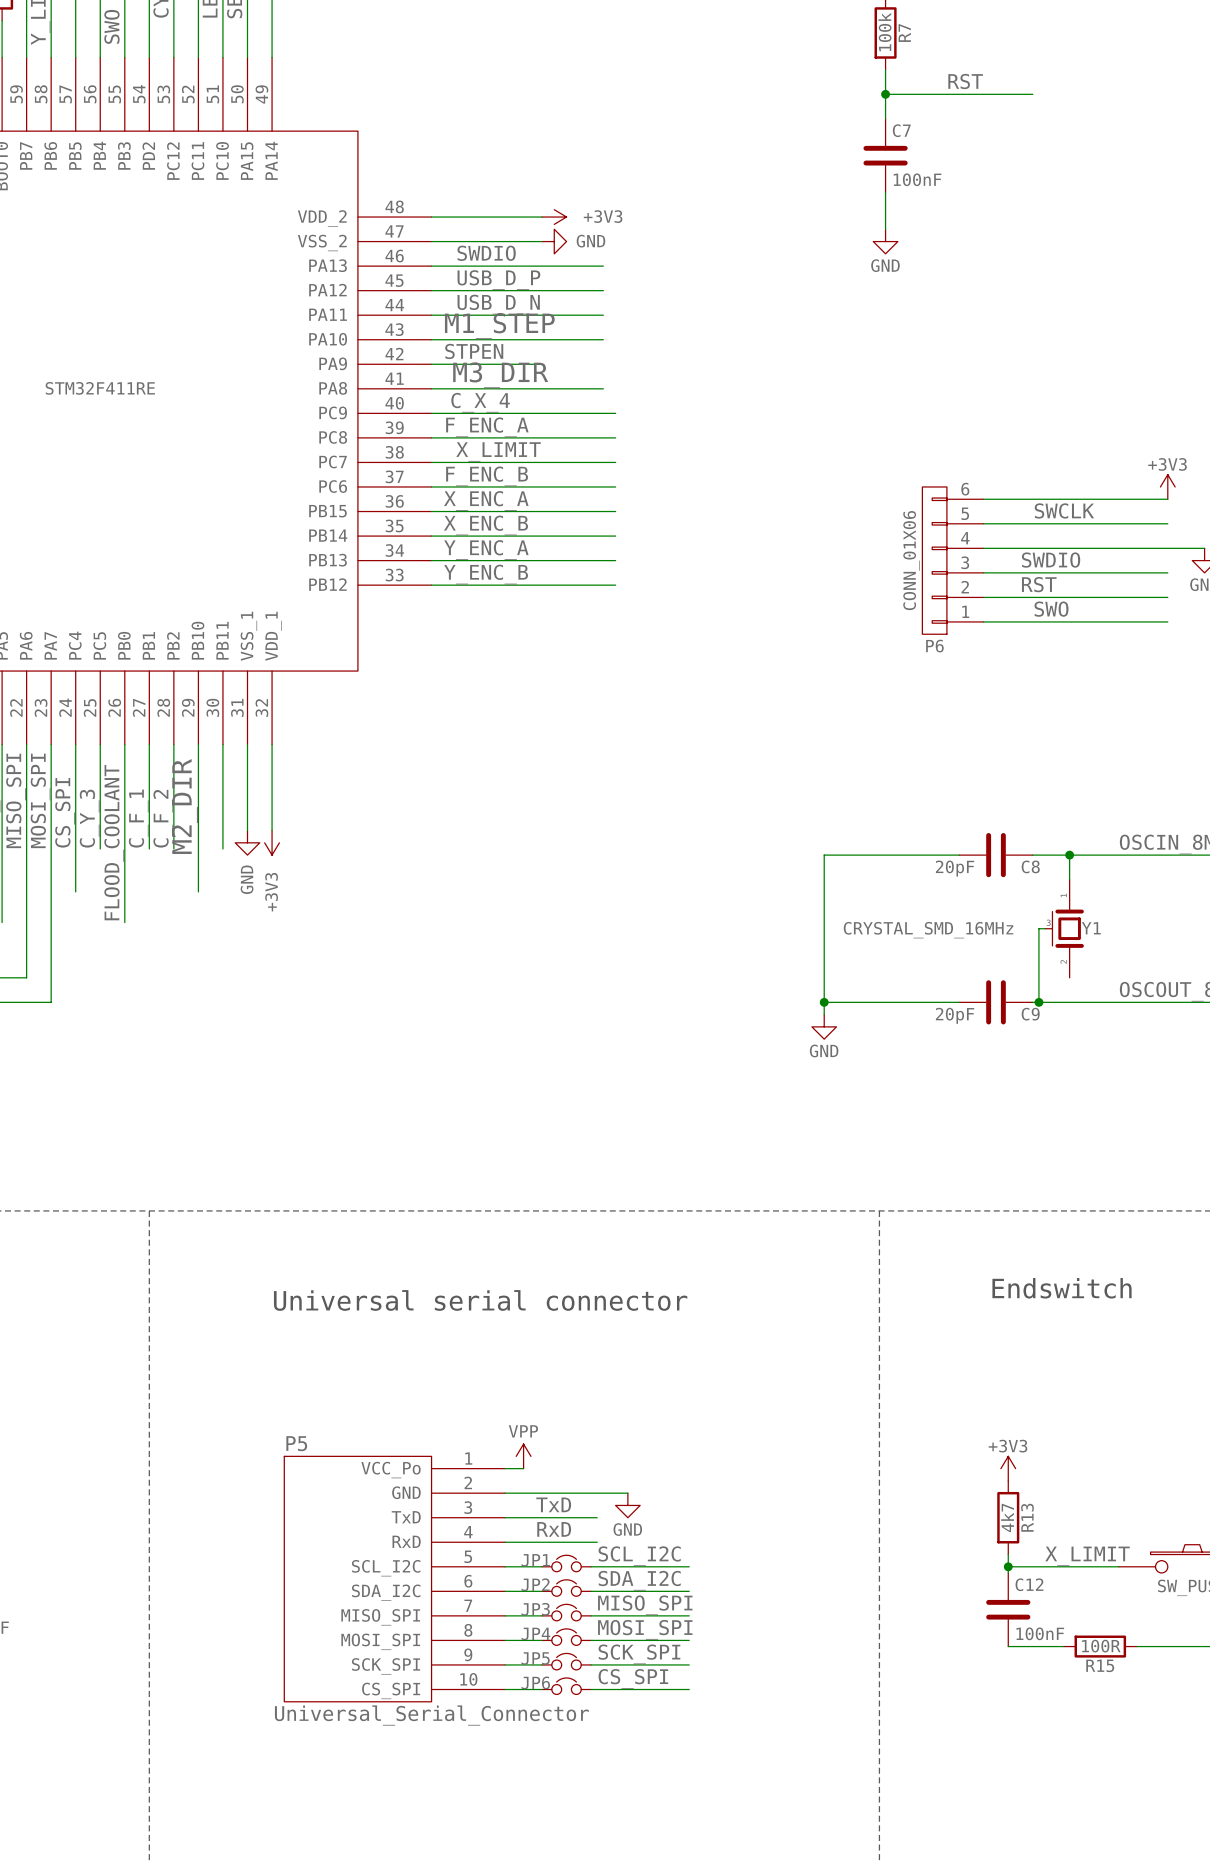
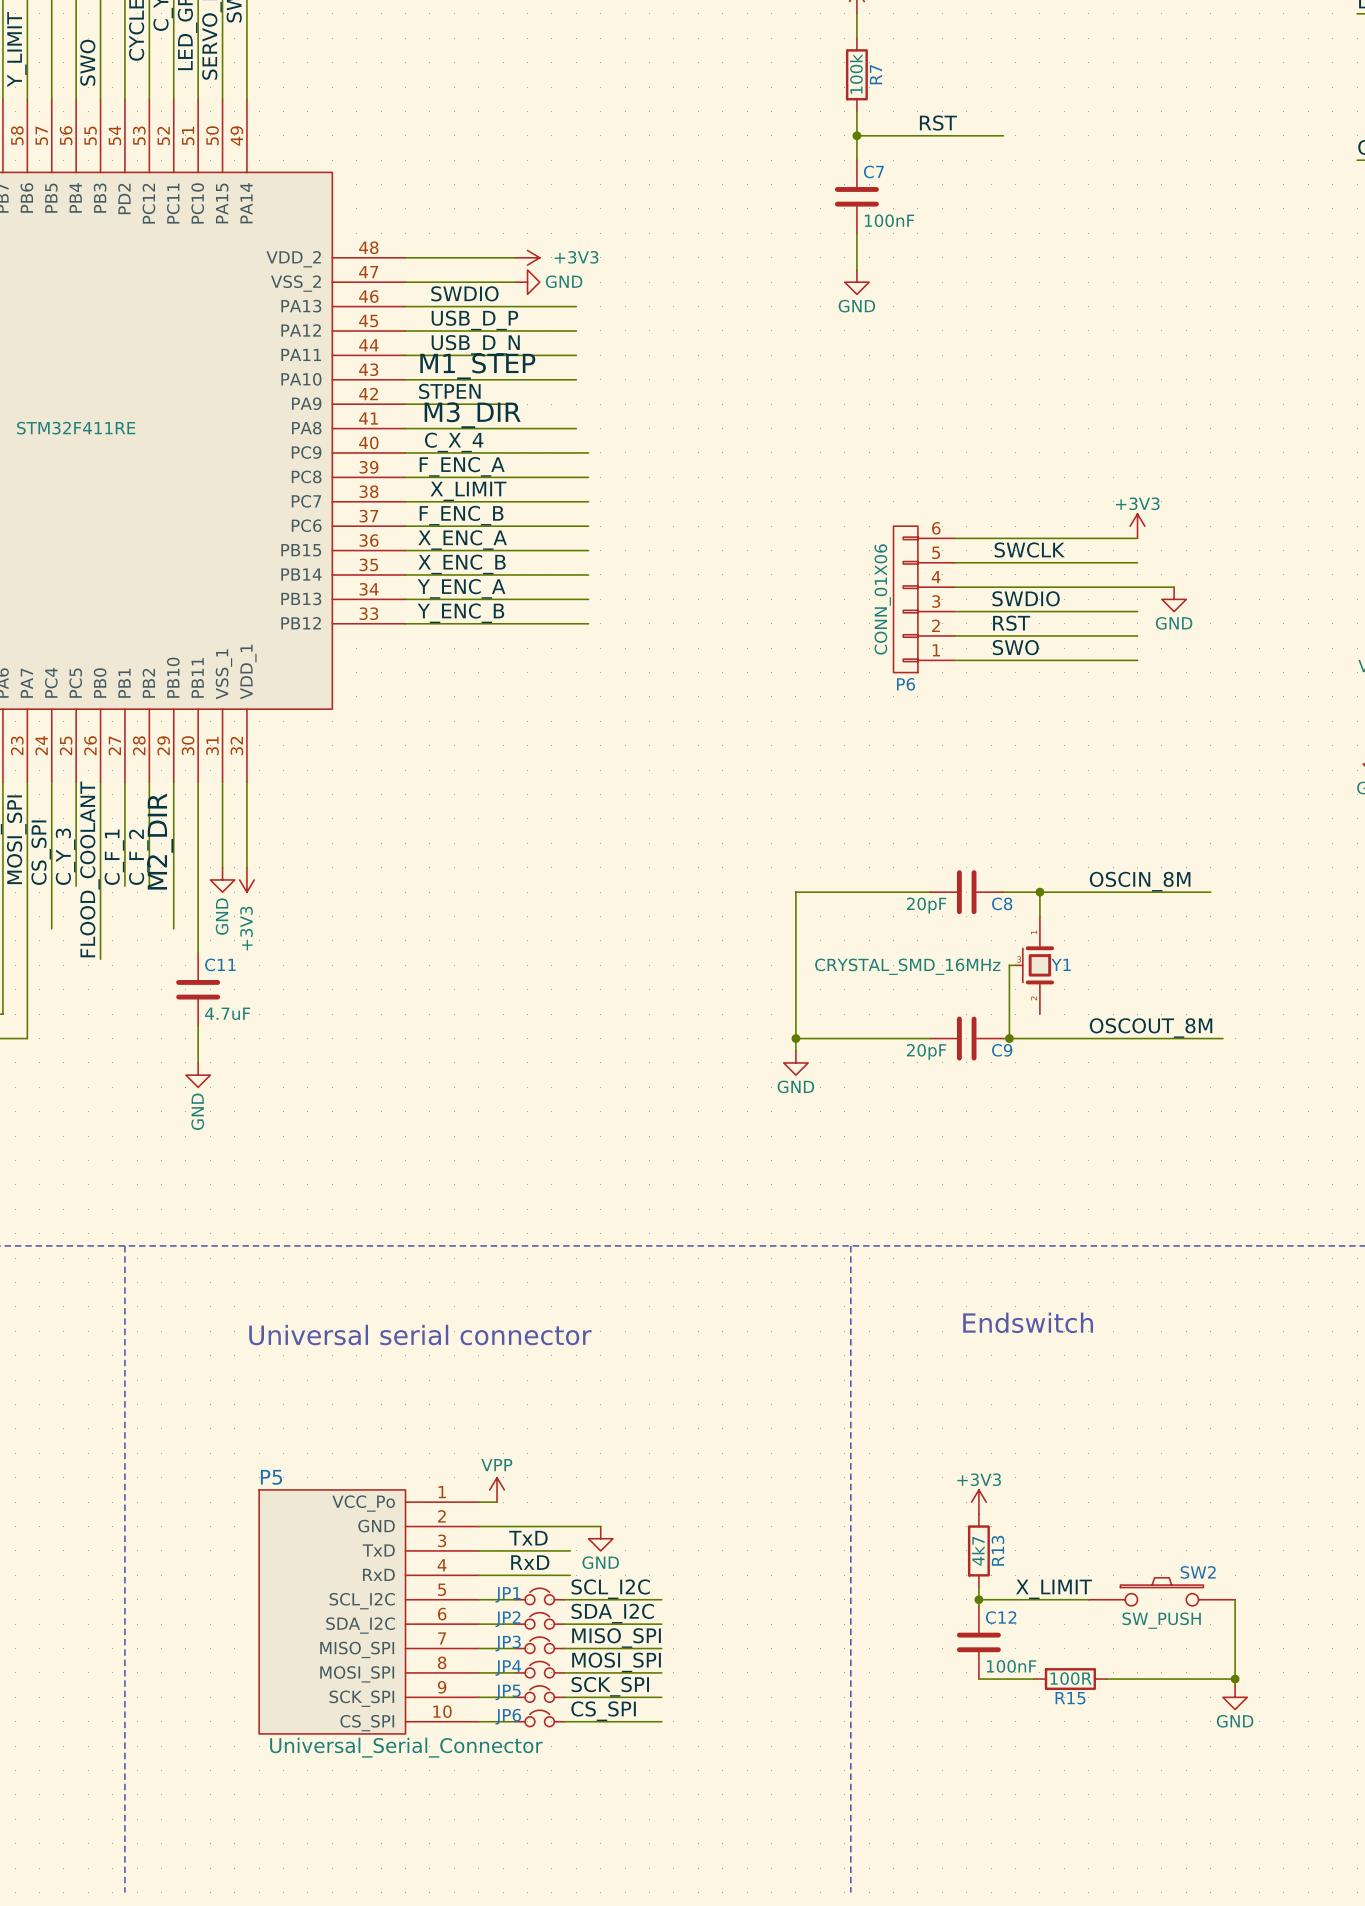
wire: none -> (198, 886) (198, 953)
C11: none -> 4.7uF (198, 989)
wire: none -> (198, 1026) (198, 1062)
power symbol: none -> GND (198, 1075)

